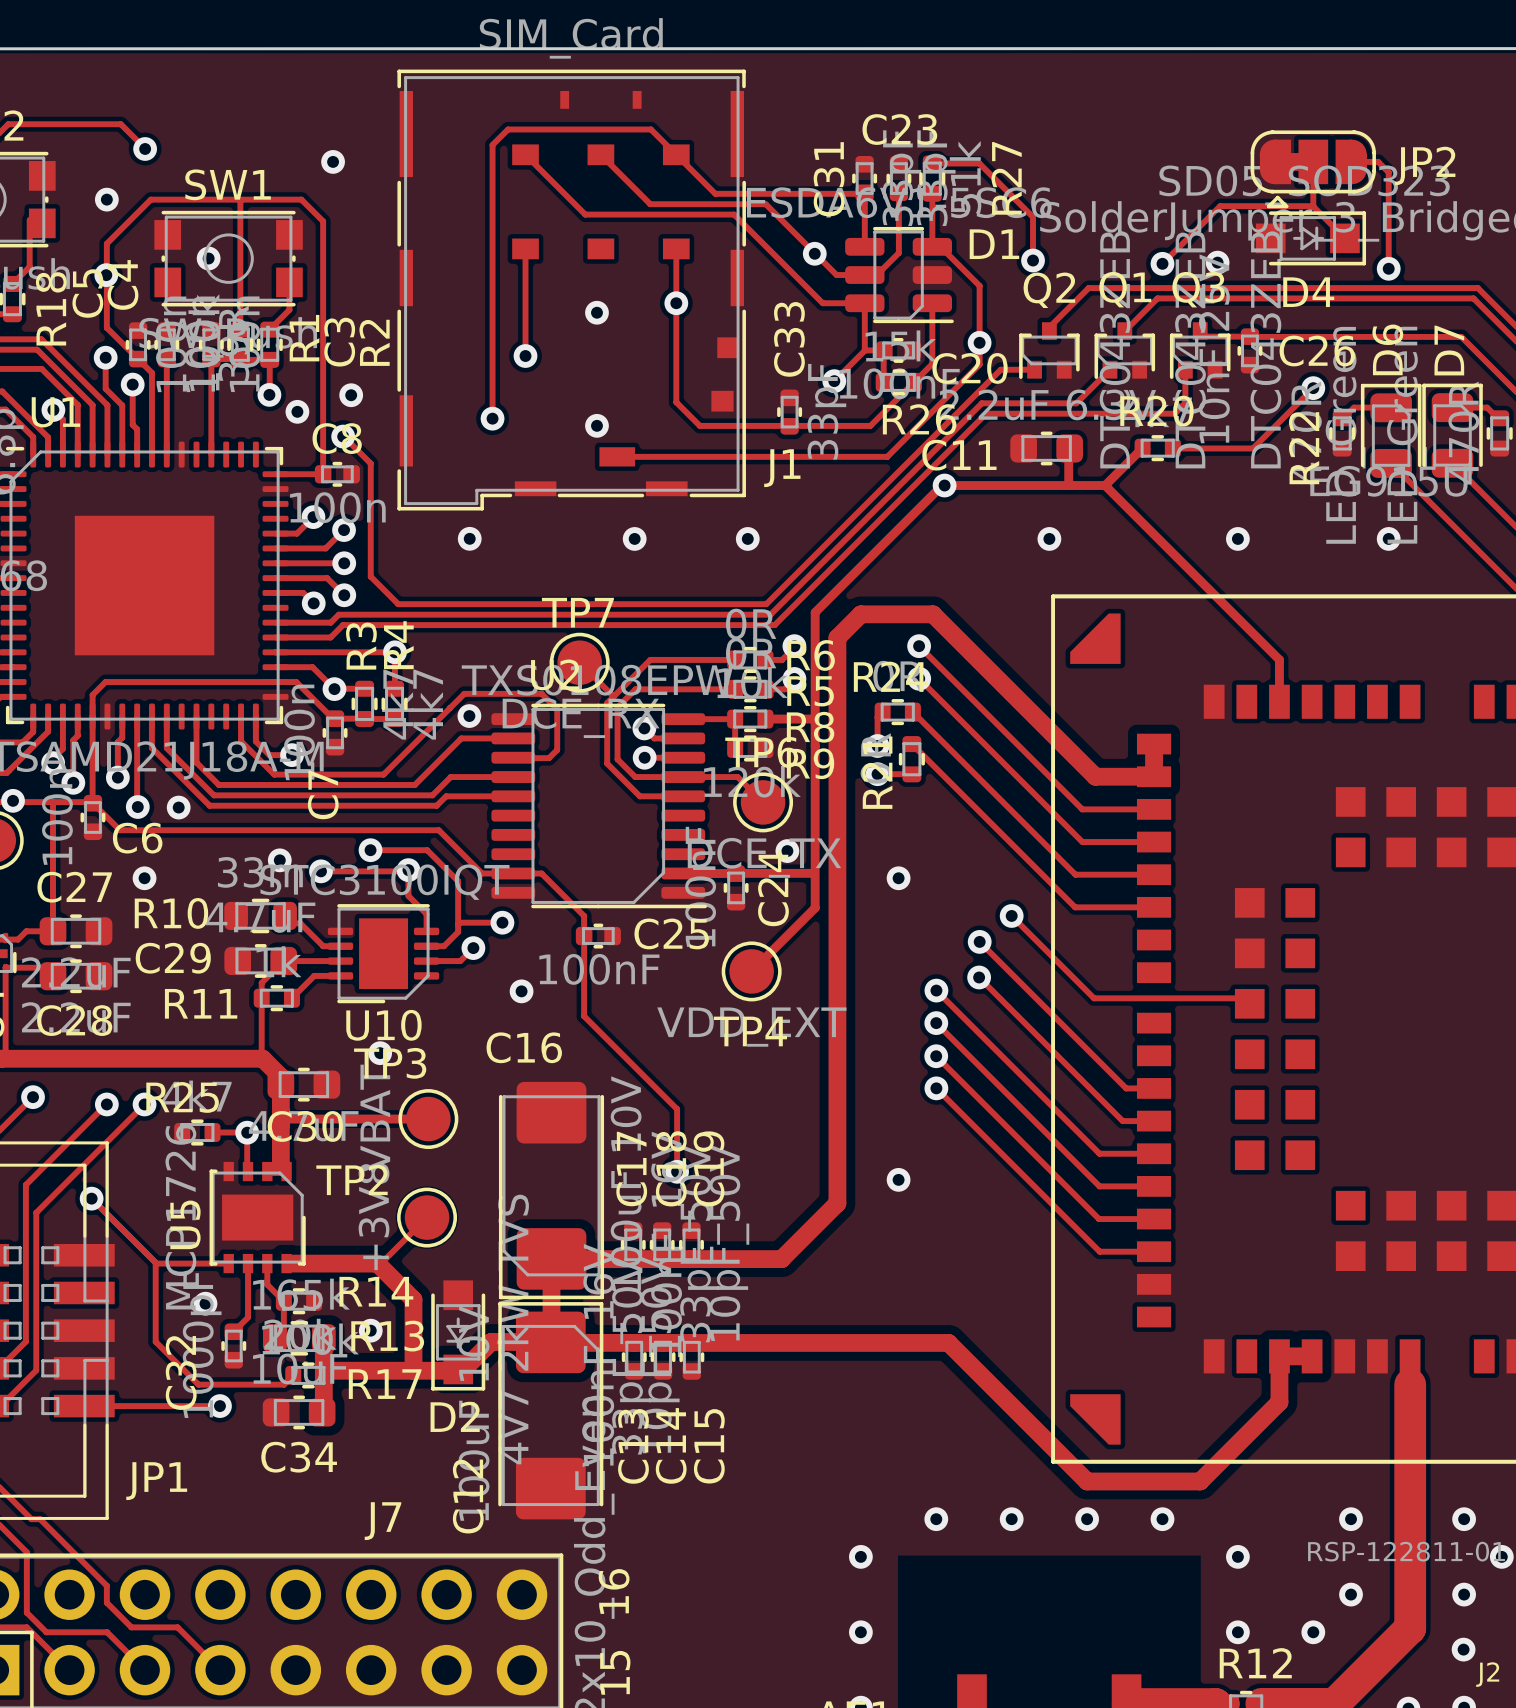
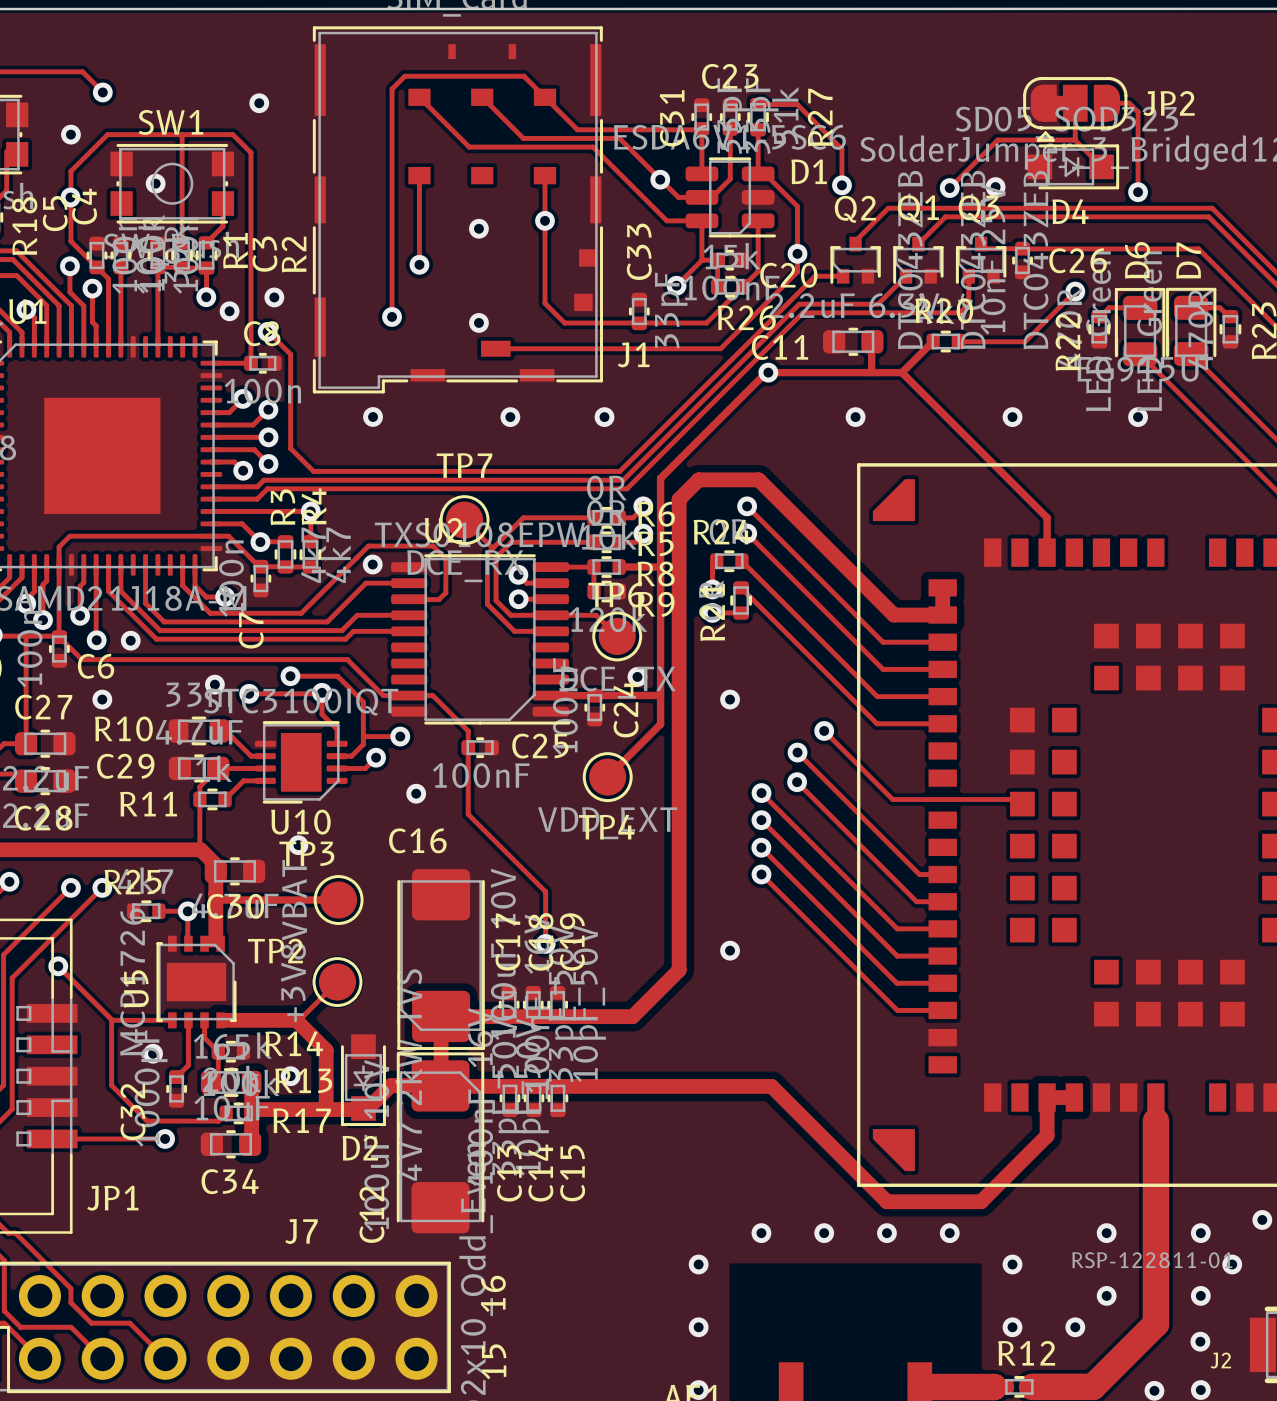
TP7 name position: TP7 (577, 612) -> TP7 (464, 465)

